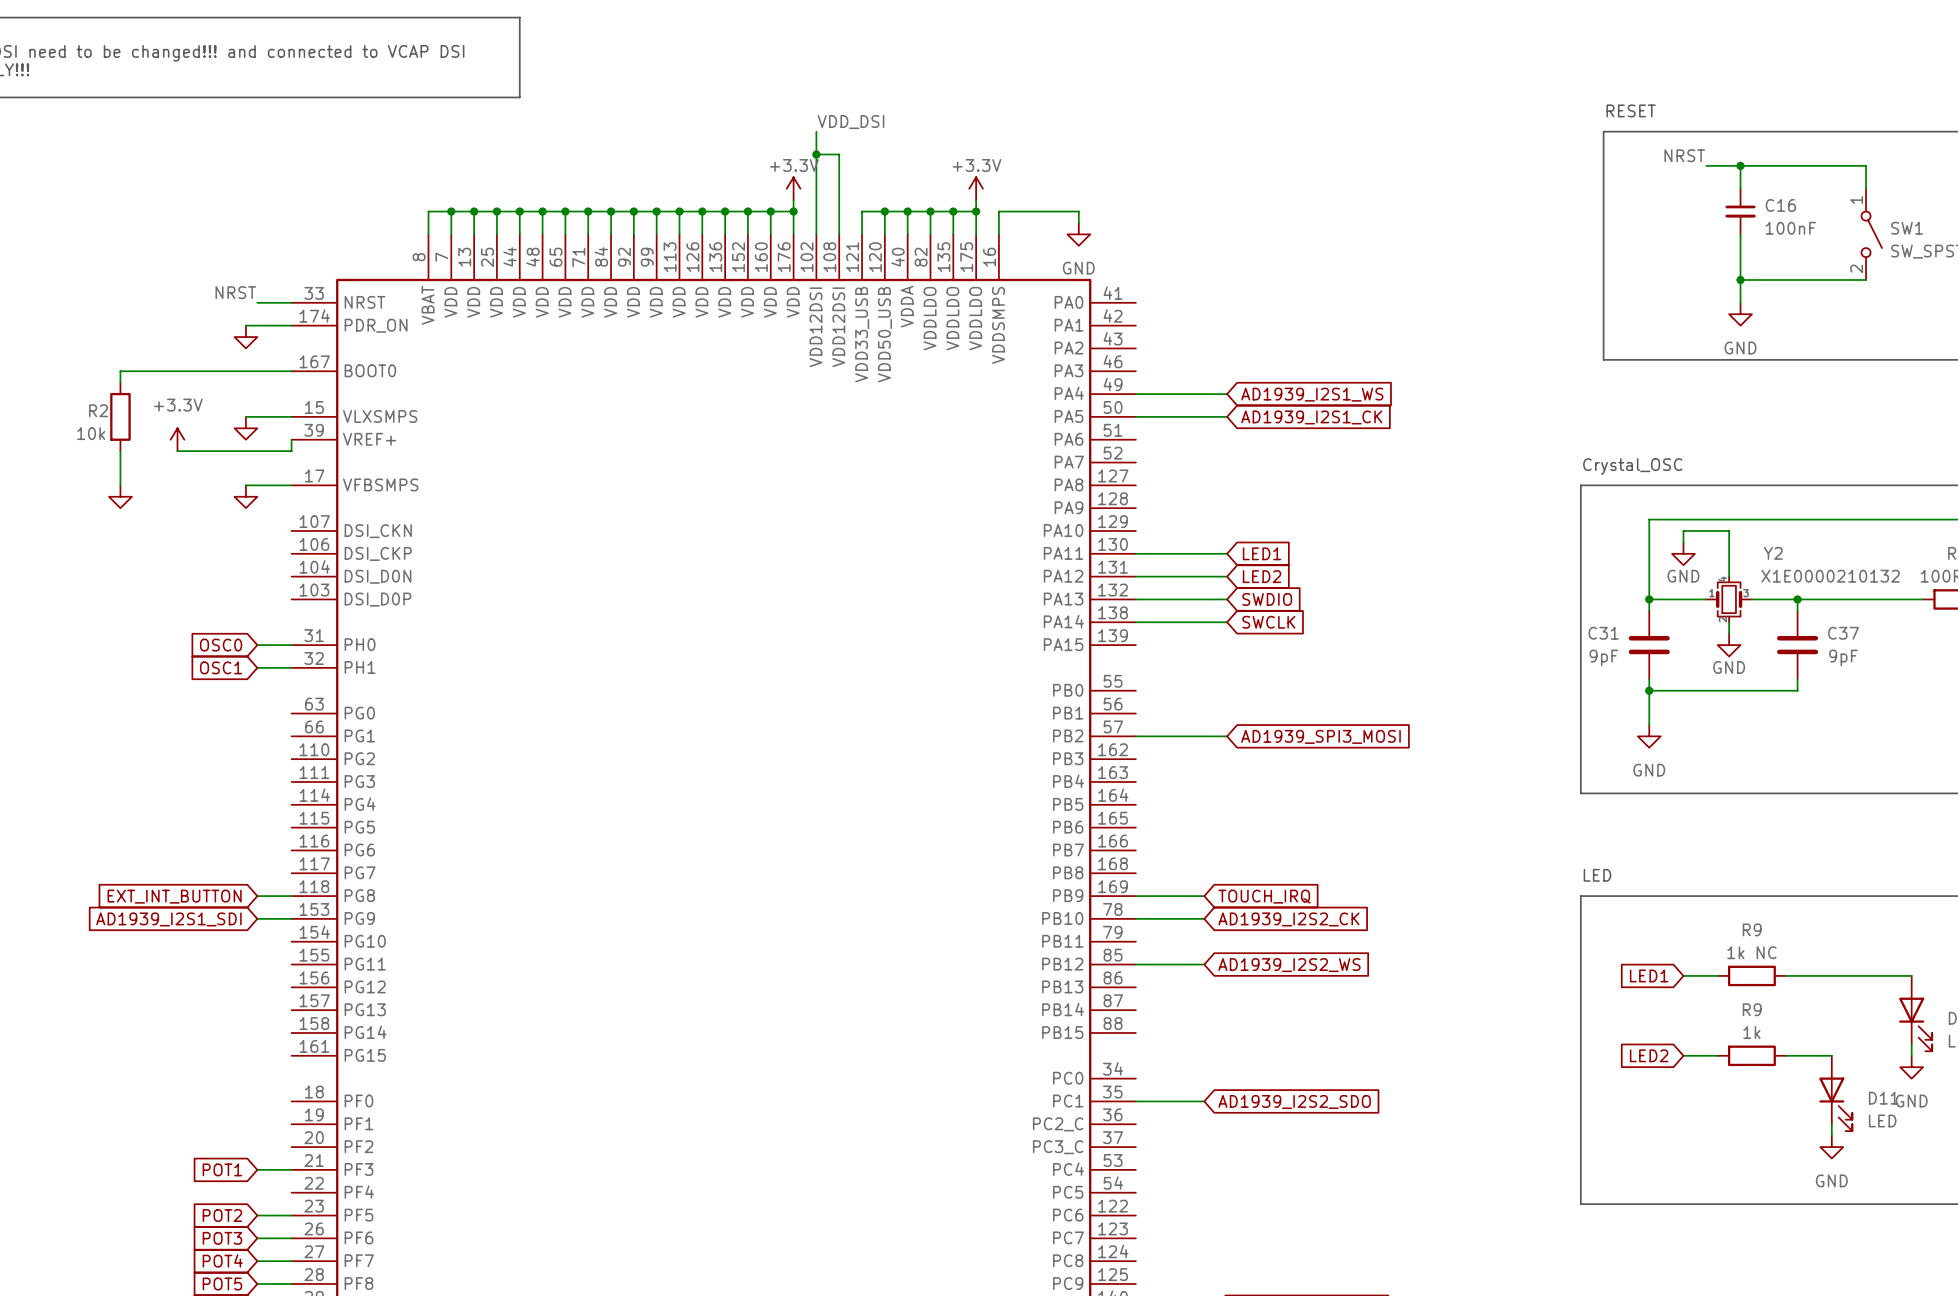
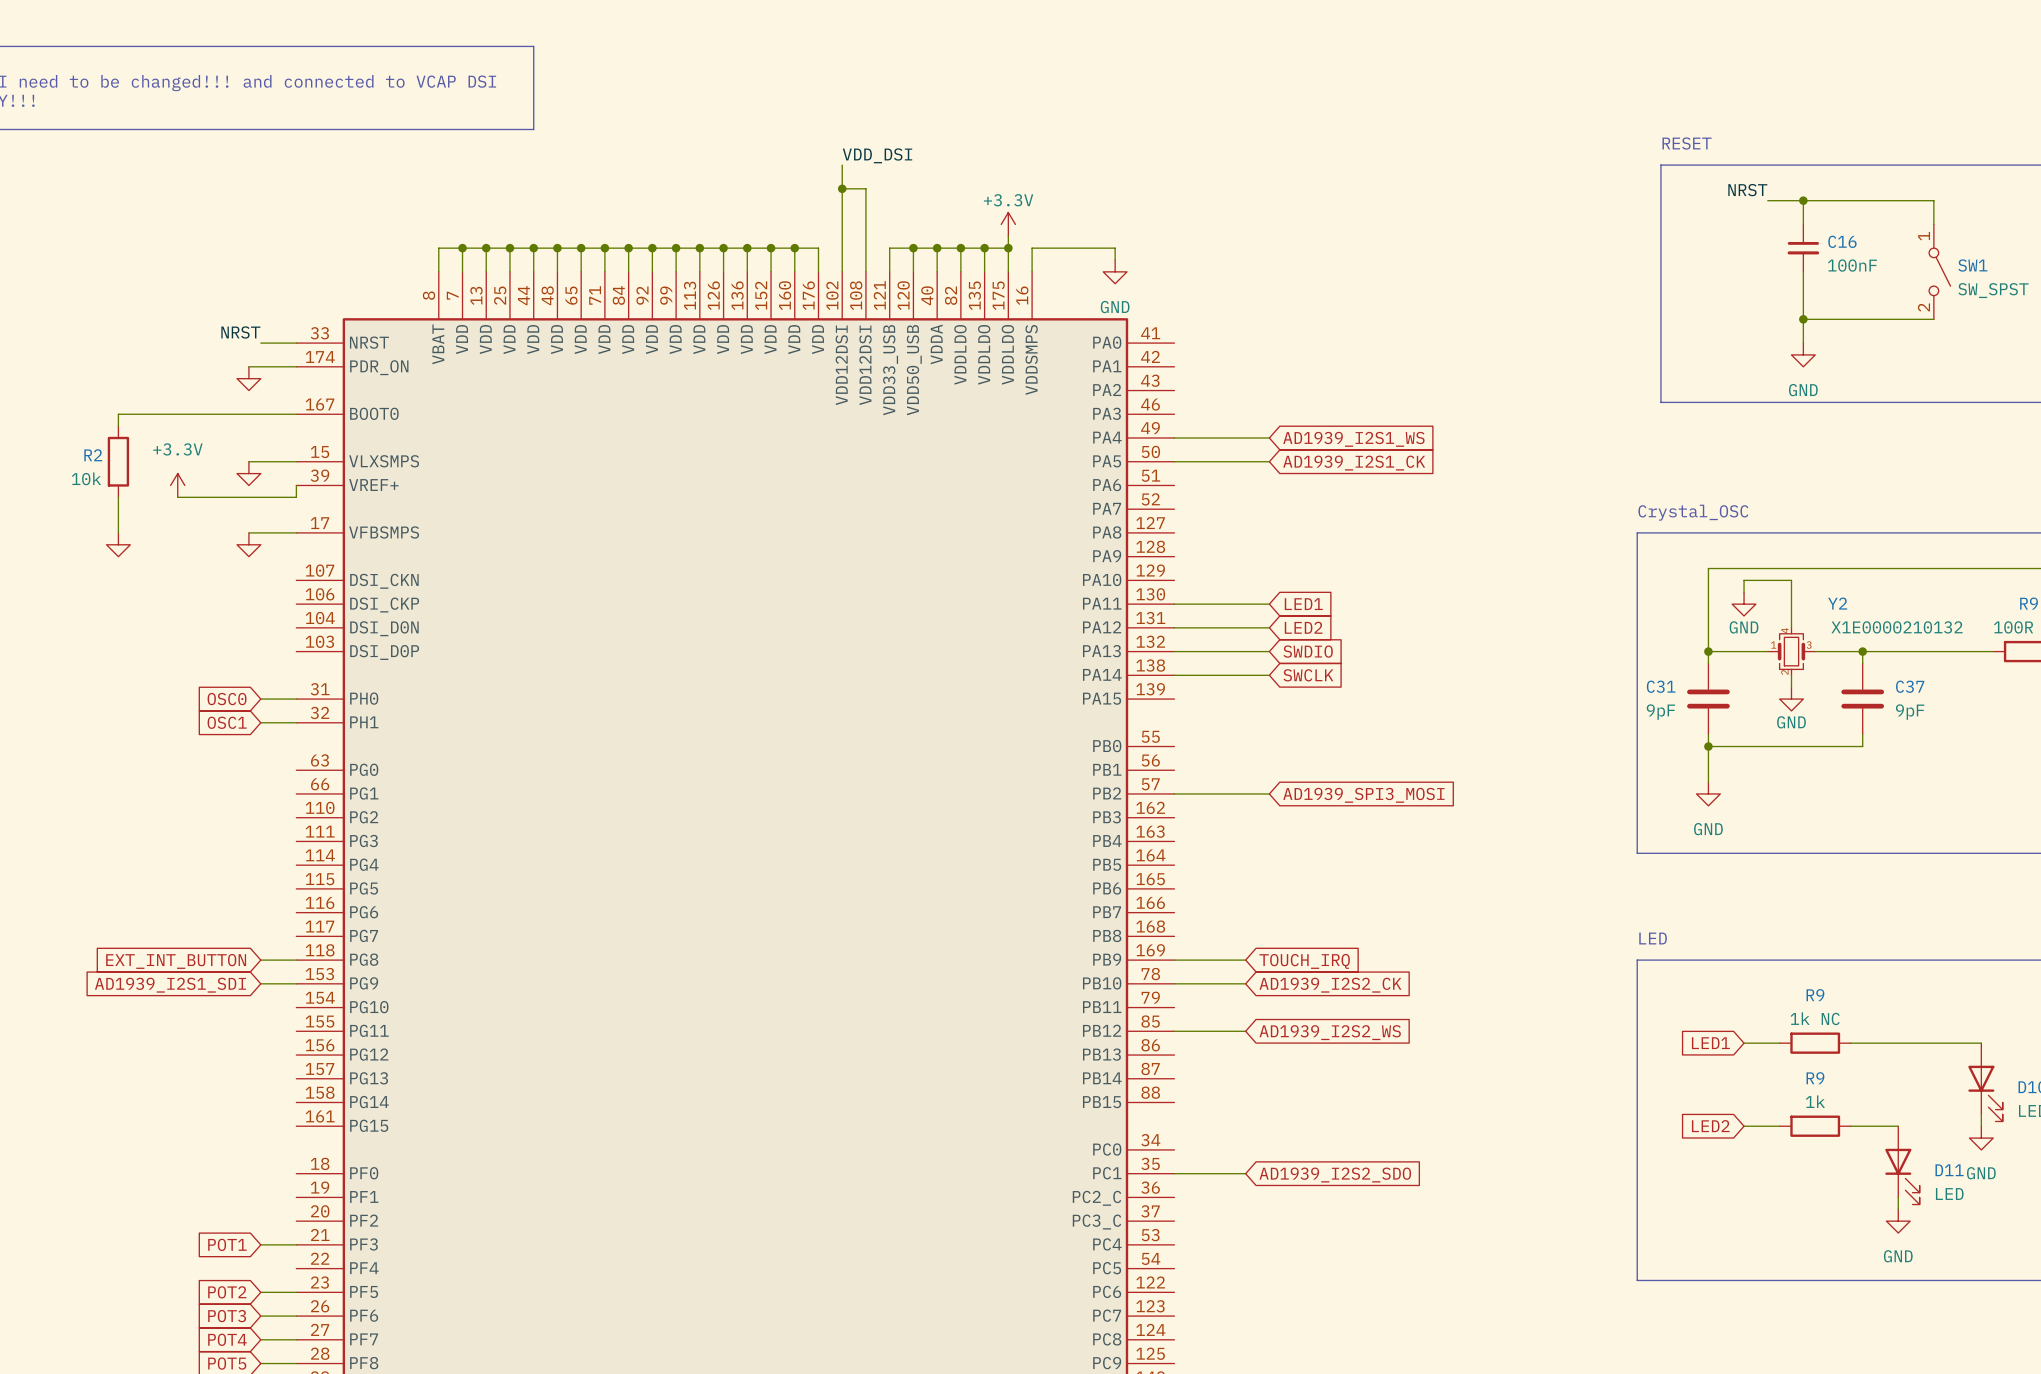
power symbol: +3.3V (793, 188) -> none
wire: (793, 200) (793, 211) -> none
junction: (793, 211) -> none

